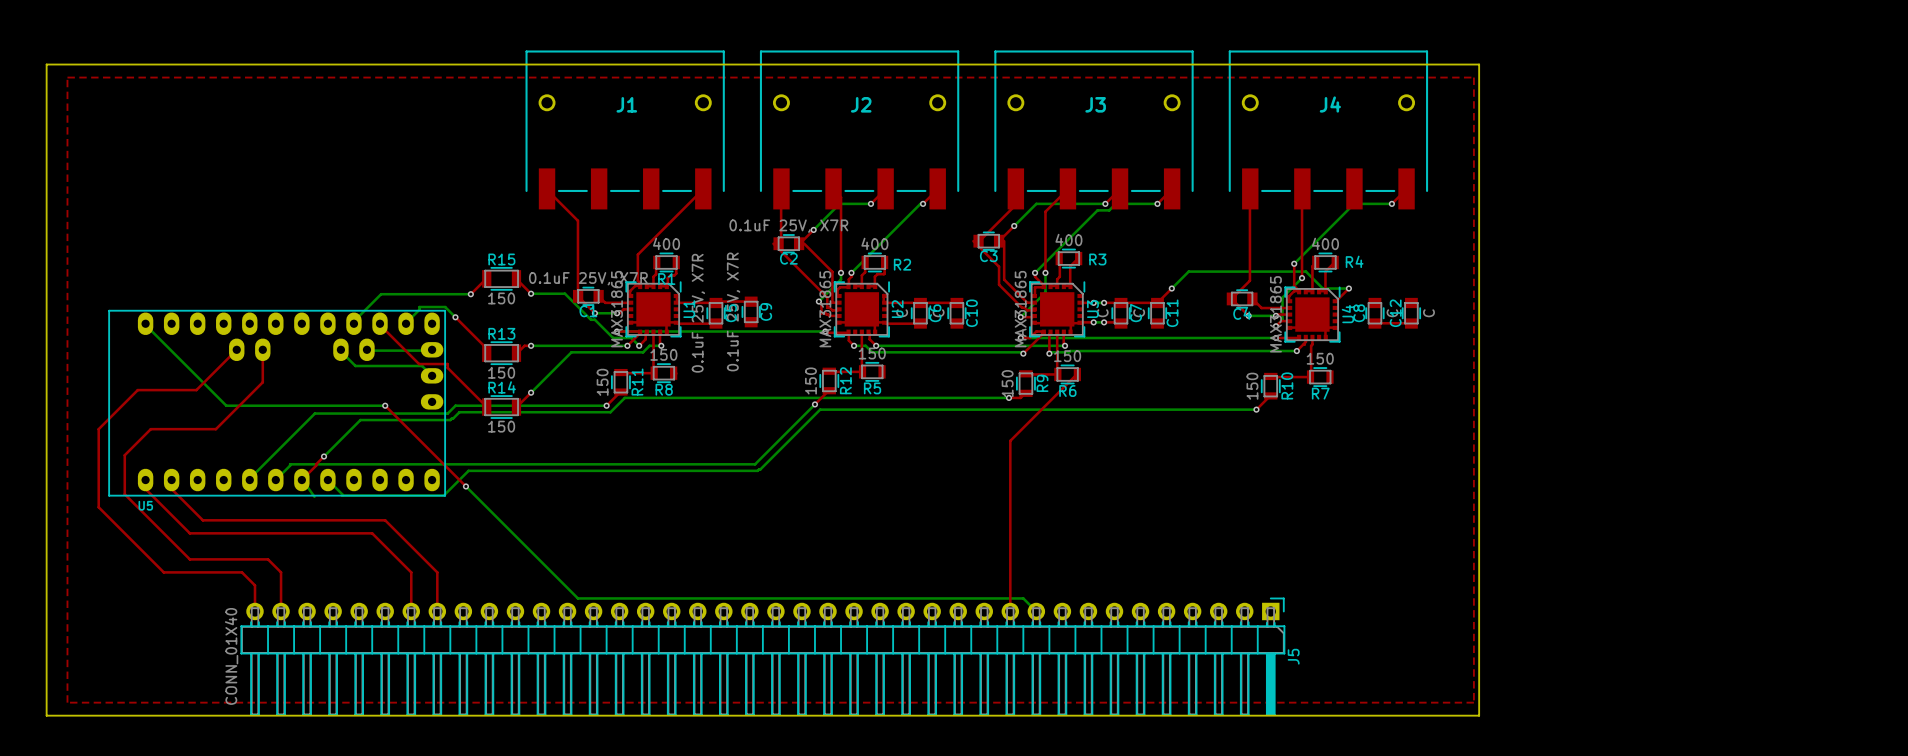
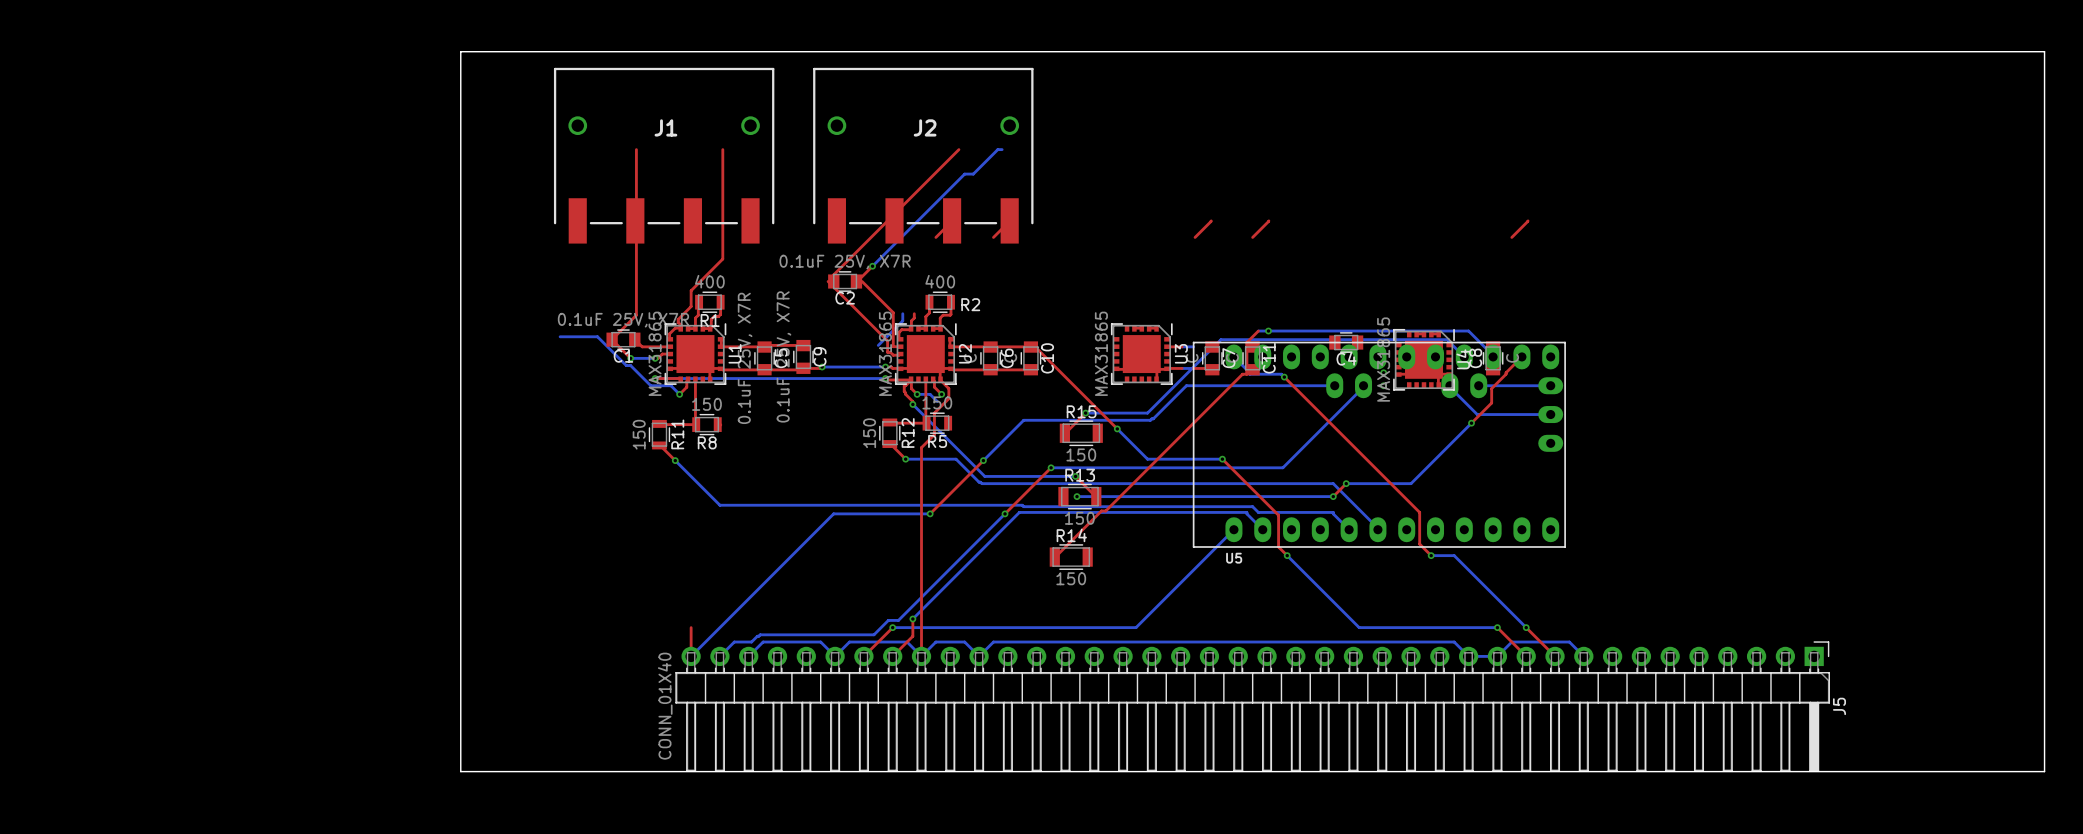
board edge: (46, 64) (46, 715) (1479, 715) (1479, 64) (46, 64) -> (460, 51) (460, 771) (2044, 771) (2044, 51) (460, 51)
top zone outline: (67, 77) (67, 702) (1473, 702) (1473, 77) (67, 77) -> none
top track: none -> (958, 149) (833, 274) (833, 282)
J3: (1093, 129) -> none
J4: (1328, 129) -> none
top track: (547, 188) (577, 220) (577, 296) -> (636, 149) (636, 315) (611, 339)
top track: (703, 188) (637, 254) (637, 278) -> (722, 149) (722, 259) (691, 290) (691, 306) (678, 319)
top track: (781, 188) (781, 241) -> none
top track: (833, 188) (841, 197) (841, 272) -> none
top track: (1015, 188) (1015, 205) (978, 241) -> none
top track: (1067, 188) (1045, 211) (1045, 272) -> none
top track: (1250, 188) (1249, 280) (1231, 298) (1248, 315) -> none
top track: (1302, 188) (1302, 278) -> none
bottom track: (839, 203) (870, 203) -> (901, 237) (964, 174) (973, 174) (997, 149) (1002, 149)
via: (870, 203) -> none
bottom track: (923, 203) (920, 203) (851, 272) -> none
via: (923, 203) -> none
bottom track: (1105, 203) (1036, 203) (1014, 226) -> none
via: (1105, 203) -> none
bottom track: (1157, 203) (1115, 203) (1109, 210) (1097, 210) (1035, 272) -> none
via: (1157, 203) -> none
bottom track: (1391, 203) (1354, 203) (1294, 263) -> none
via: (1391, 203) -> none
top track: (1014, 226) (999, 241) -> none
via: (1014, 226) -> none
top track: (973, 241) (999, 266) (999, 284) (1022, 307) (1027, 310) (1034, 309) -> none
C3: (988, 241) -> none
top track: (1004, 241) (1004, 279) (1027, 302) (1034, 302) -> none
top track: (1059, 258) (1059, 276) (1057, 279) (1057, 286) -> none
R3: 400 (1068, 258) -> none
top track: (1078, 258) (1070, 266) (1070, 286) -> none
top track: (1315, 262) (1312, 266) (1312, 291) -> none
R4: 400 (1325, 262) -> none
top track: (1335, 262) (1325, 271) (1325, 291) -> none
top track: (1294, 263) (1294, 285) (1299, 291) -> none
via: (1294, 263) -> none
via: (841, 272) -> none
via: (851, 272) -> none
top track: (1035, 272) (1035, 276) (1044, 285) (1034, 287) (1034, 296) -> none
via: (1035, 272) -> none
bottom track: (1045, 272) (1045, 292) (1020, 317) -> none
via: (1045, 272) -> none
top track: (486, 278) (470, 294) -> none
R15 position: (501, 278) -> (1081, 433)
top track: (516, 278) (531, 293) -> none
bottom track: (1302, 278) (1282, 297) (1282, 319) (1275, 326) -> none
via: (1302, 278) -> none
top track: none -> (1258, 331) (1246, 342) (1246, 374) (1242, 374) (1105, 511) (1101, 511) (1054, 557)
bottom track: (1171, 288) (1188, 271) (1305, 271) (1322, 288) -> (1258, 331) (1435, 331)
top track: (1348, 288) (1335, 301) -> none
bottom track: none -> (1464, 331) (1468, 331) (1493, 356)
via: (1348, 288) -> none
top track: (1299, 291) (1294, 291) (1289, 296) (1289, 301) -> none
via: (531, 293) -> none
bottom track: (470, 294) (381, 294) (352, 322) (352, 324) (353, 323) -> none
via: (470, 294) -> none
top track: (1252, 298) (1261, 308) (1289, 307) -> none
top track: (818, 301) (821, 304) (821, 313) (838, 315) -> none
via position: (818, 301) -> (885, 367)
top track: none -> (1030, 346) (1035, 346) (1117, 428)
via: (1093, 302) -> none
top track: (1104, 302) (1157, 302) -> none
via: (1104, 302) -> none
bottom track: none -> (1233, 356) (1249, 374) (1281, 374) (1284, 377)
bottom track: none -> (1464, 356) (1448, 339) (1220, 339) (1147, 413) (1085, 413)
top track: none -> (1521, 356) (1491, 388) (1491, 403) (1471, 423)
C12: C (1411, 313) -> none
top track: (1289, 314) (1275, 315) -> none
bottom track: (1248, 315) (1275, 315) -> none
via: (1275, 315) -> none
top track: (1034, 316) (1020, 317) -> none
top track: (455, 317) (486, 348) (486, 353) -> none
bottom track: (455, 317) (445, 307) (419, 307) (419, 309) (406, 323) -> none
via: (455, 317) -> none
via: (1020, 317) -> none
top track: none -> (822, 367) (802, 369) (764, 369)
bottom track: none -> (822, 367) (885, 367)
via: none -> (822, 367)
top track: none -> (885, 367) (899, 368)
top track: (1289, 321) (1281, 321) (1275, 326) -> none
via: (1093, 322) -> none
via: (1104, 322) -> none
bottom track: (145, 323) (226, 405) (385, 405) -> none
top track: (380, 323) (419, 364) (447, 364) (447, 367) (486, 407) -> none
top track: none -> (990, 369) (1030, 369)
top track: (1374, 323) (1411, 323) -> none
top track: none -> (1284, 377) (1419, 512) (1419, 544) (1431, 555)
via: none -> (1284, 377)
top track: (640, 332) (627, 345) -> none
top track: (660, 332) (661, 345) -> none
top track: none -> (911, 379) (904, 385) (904, 391) (912, 401) (912, 404)
top track: none -> (940, 379) (948, 388) (948, 398) (934, 413) (934, 434) (921, 447) (921, 656)
top track: (1044, 332) (1036, 331) (1029, 338) (1020, 338) -> none
top track: (1044, 332) (1023, 353) -> none
top track: (1050, 333) (1049, 353) -> none
top track: (1058, 333) (1058, 374) (1025, 373) -> none
top track: (1063, 333) (1065, 345) -> none
top track: (1299, 337) (1275, 338) -> none
top track: (1305, 337) (1304, 344) (1296, 351) -> none
top track: (1312, 337) (1311, 377) (1270, 376) -> none
bottom track: (1020, 338) (1097, 338) -> (983, 460) (1023, 420) (1150, 420) (1186, 385)
via: (1020, 338) -> none
bottom track: (1231, 338) (1275, 338) -> none
bottom track: none -> (1363, 385) (1282, 467) (1051, 467)
bottom track: none -> (1449, 385) (1477, 414) (1550, 414)
bottom track: none -> (1478, 385) (1550, 385)
top track: (531, 345) (524, 345) (516, 353) -> none
bottom track: (531, 345) (627, 345) -> none
via: (531, 345) -> none
via: (627, 345) -> none
bottom track: (661, 345) (649, 345) (643, 352) (571, 352) (531, 392) -> none
via: (661, 345) -> none
bottom track: (876, 345) (1065, 345) -> none
via: (1065, 345) -> none
top track: (236, 349) (196, 390) (137, 390) (98, 429) (98, 507) (163, 572) (241, 572) (255, 585) (255, 611) -> none
bottom track: (340, 349) (355, 366) (422, 366) (432, 375) -> none
bottom track: (366, 349) (432, 349) -> none
top track: (260, 351) (262, 349) (262, 382) (215, 429) (150, 429) (124, 455) (124, 494) (189, 559) (268, 559) (281, 572) (281, 611) -> none
bottom track: (1296, 351) (1070, 351) (1049, 353) -> none
via: (1296, 351) -> none
bottom track: (872, 352) (1023, 353) -> none
R13 position: (501, 353) -> (1079, 496)
via: (1023, 353) -> none
via: (1049, 353) -> none
bottom track: none -> (912, 404) (984, 476) (1075, 476)
via: none -> (912, 404)
top track: none -> (1085, 413) (1064, 433)
via: none -> (1085, 413)
bottom track: none -> (1471, 423) (1411, 483) (1346, 483)
via: none -> (1471, 423)
R6: 150 (1067, 374) -> none
top track: (1077, 374) (1010, 440) (1009, 612) -> none
bottom track: none -> (1117, 428) (1147, 459) (1222, 459)
via: none -> (1117, 428)
R7: 150 (1320, 377) -> none
R9: 150 (1025, 383) -> none
R10: 150 (1270, 386) -> none
top track: (829, 390) (814, 404) -> (889, 443) (905, 459)
top track: (620, 391) (606, 405) -> (659, 444) (675, 460)
top track: (531, 392) (516, 407) -> none
via: (531, 392) -> none
top track: (1025, 393) (1020, 397) (1009, 397) -> none
top track: (1270, 395) (1256, 409) -> none
bottom track: (1009, 397) (624, 397) (610, 412) (459, 412) (450, 420) (360, 420) (324, 456) -> none
via: (1009, 397) -> none
U5 position: (277, 403) -> (1379, 444)
bottom track: (814, 404) (755, 464) (290, 464) (275, 479) -> none
via position: (814, 404) -> (905, 459)
bottom track: none -> (905, 459) (956, 459) (981, 483) (1333, 483) (1377, 529)
top track: none -> (1222, 459) (1278, 515) (1278, 546) (1287, 555)
via: none -> (1222, 459)
top track: (385, 405) (465, 486) -> none
via: (385, 405) -> none
bottom track: (606, 405) (455, 405) (447, 413) (314, 413) (249, 479) -> none
via position: (606, 405) -> (675, 460)
bottom track: none -> (675, 460) (719, 505) (1252, 506) (1258, 512) (1333, 512) (1349, 529)
top track: none -> (983, 460) (930, 513)
via: none -> (983, 460)
R14 position: (501, 407) -> (1071, 557)
bottom track: (1256, 409) (820, 409) (757, 470) (468, 470) (443, 495) (342, 495) (327, 479) -> none
via: (1256, 409) -> none
top track: none -> (1051, 467) (1005, 513)
via: none -> (1051, 467)
top track: none -> (1075, 476) (1096, 496)
via: none -> (1075, 476)
top track: none -> (1346, 483) (1333, 496)
via: none -> (1346, 483)
bottom track: none -> (1077, 496) (1333, 496)
via: none -> (1077, 496)
via: none -> (1333, 496)
bottom track: none -> (930, 513) (833, 513) (691, 656)
via: none -> (930, 513)
bottom track: none -> (1005, 513) (898, 620) (888, 620) (873, 634) (760, 634) (751, 642) (734, 642) (719, 656)
via: none -> (1005, 513)
top track: (324, 456) (301, 478) -> none
via: (324, 456) -> none
bottom track: none -> (1233, 529) (1136, 627) (892, 627)
bottom track: none -> (1262, 529) (1246, 512) (1019, 512) (912, 618)
top track: (171, 480) (171, 489) (202, 520) (385, 520) (437, 572) (437, 612) -> none
bottom track: (301, 480) (314, 496) -> none
bottom track: (465, 486) (577, 598) (1023, 598) (1037, 612) -> none
via: (465, 486) -> none
top track: (145, 489) (189, 533) (372, 533) (411, 572) (411, 611) -> none
bottom track: none -> (1287, 555) (1359, 627) (1497, 627)
via: none -> (1287, 555)
bottom track: none -> (1431, 555) (1454, 555) (1526, 627)
via: none -> (1431, 555)
top track: none -> (912, 618) (912, 636) (892, 657)
via: none -> (912, 618)
top track: none -> (691, 627) (691, 656)
top track: none -> (892, 627) (863, 656)
via: none -> (892, 627)
top track: none -> (1497, 627) (1524, 657)
via: none -> (1497, 627)
top track: none -> (1526, 627) (1555, 656)
via: none -> (1526, 627)
bottom track: none -> (748, 656) (763, 642) (820, 642) (835, 656) (849, 642) (907, 642) (921, 656) (935, 642) (964, 642) (979, 656) (993, 642) (1454, 642) (1468, 656) (1497, 656) (1511, 642) (1569, 642) (1583, 656)
J5 position: (762, 656) -> (1252, 706)

